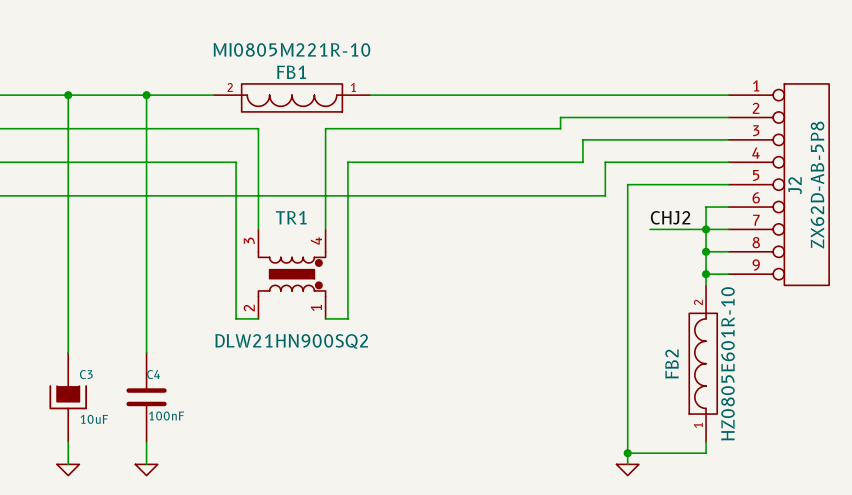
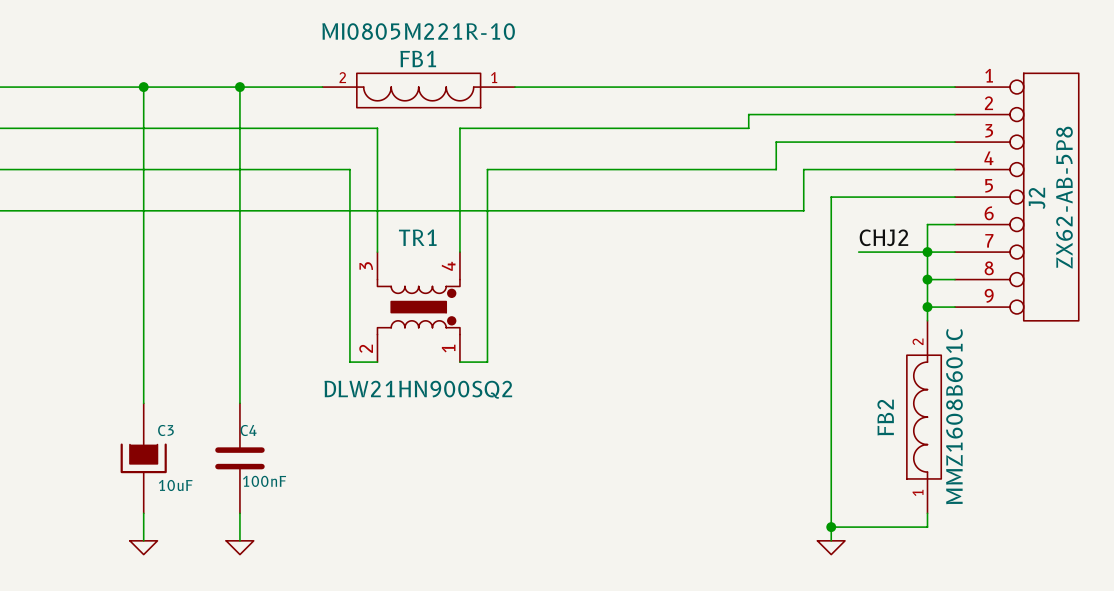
J2 value: ZX62D-AB-5P8 (817, 185) -> ZX62-AB-5P8 (1064, 197)
FB2 value: HZ0805E601R-10 (727, 363) -> MMZ1608B601C (954, 416)

